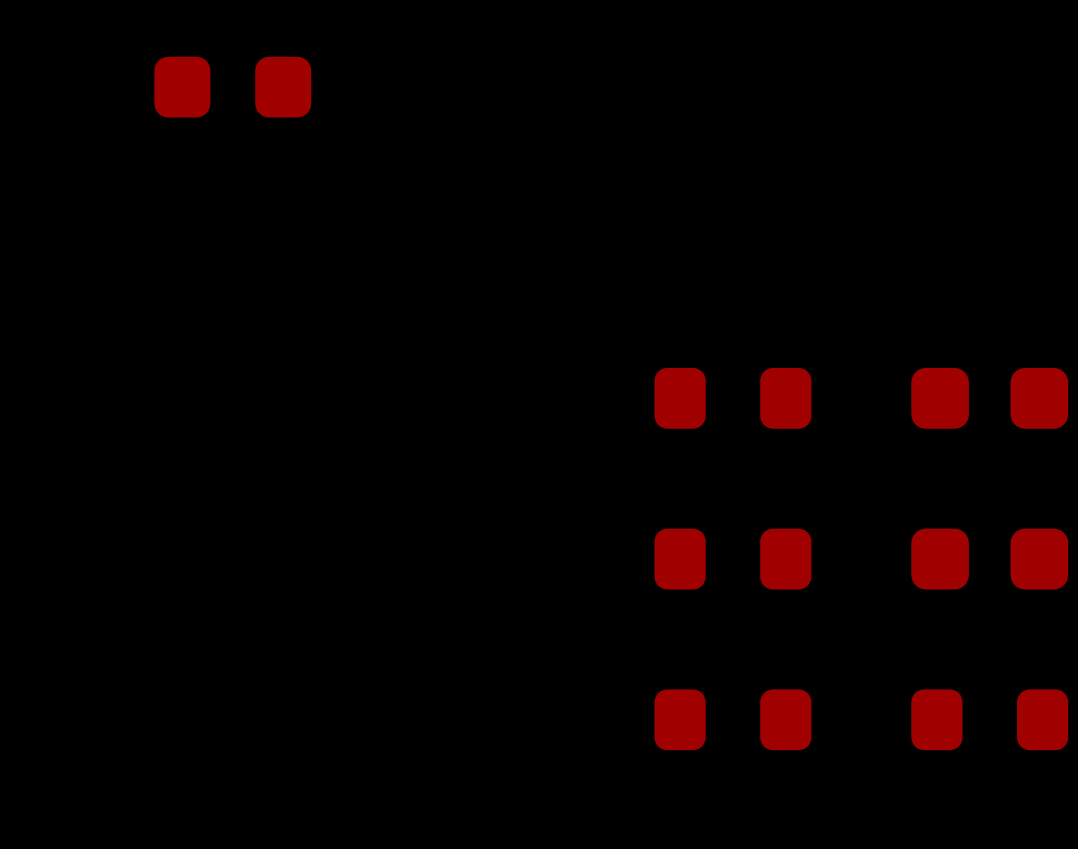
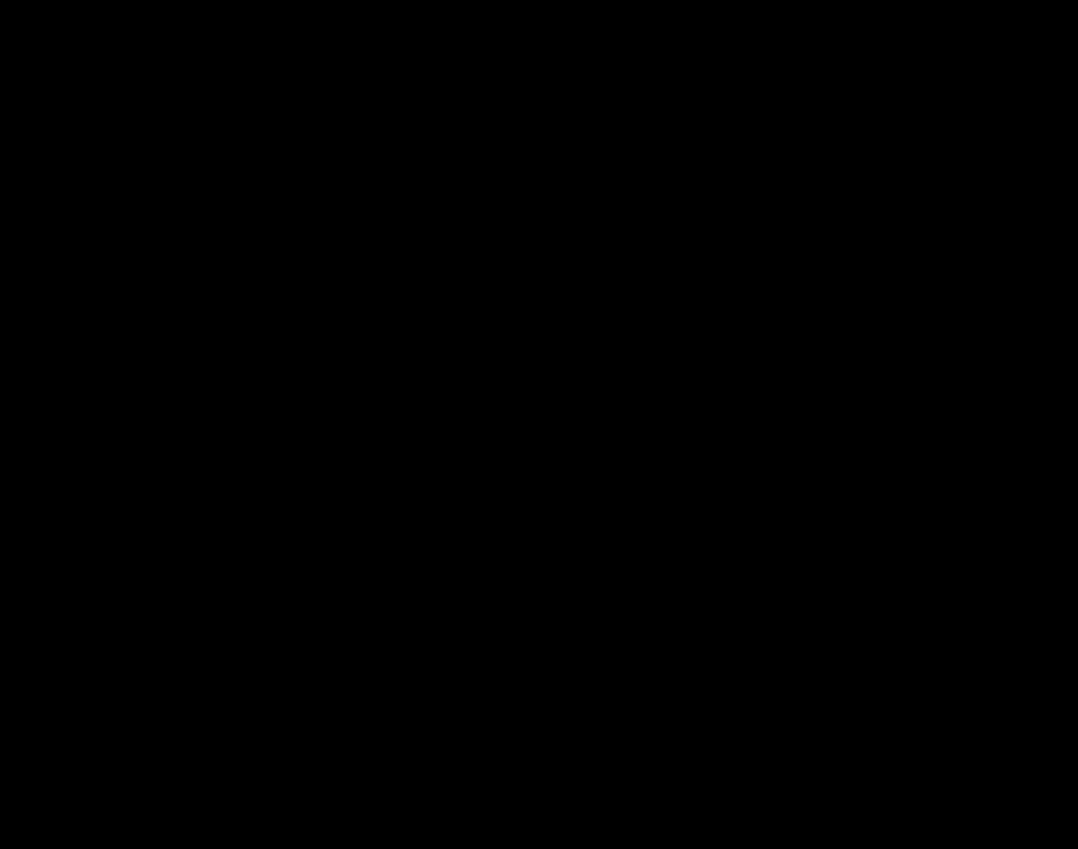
part: (232, 87) -> none
part: (732, 398) -> none
part: (989, 398) -> none
part: (732, 559) -> none
part: (989, 559) -> none
part: (732, 719) -> none
part: (989, 719) -> none

